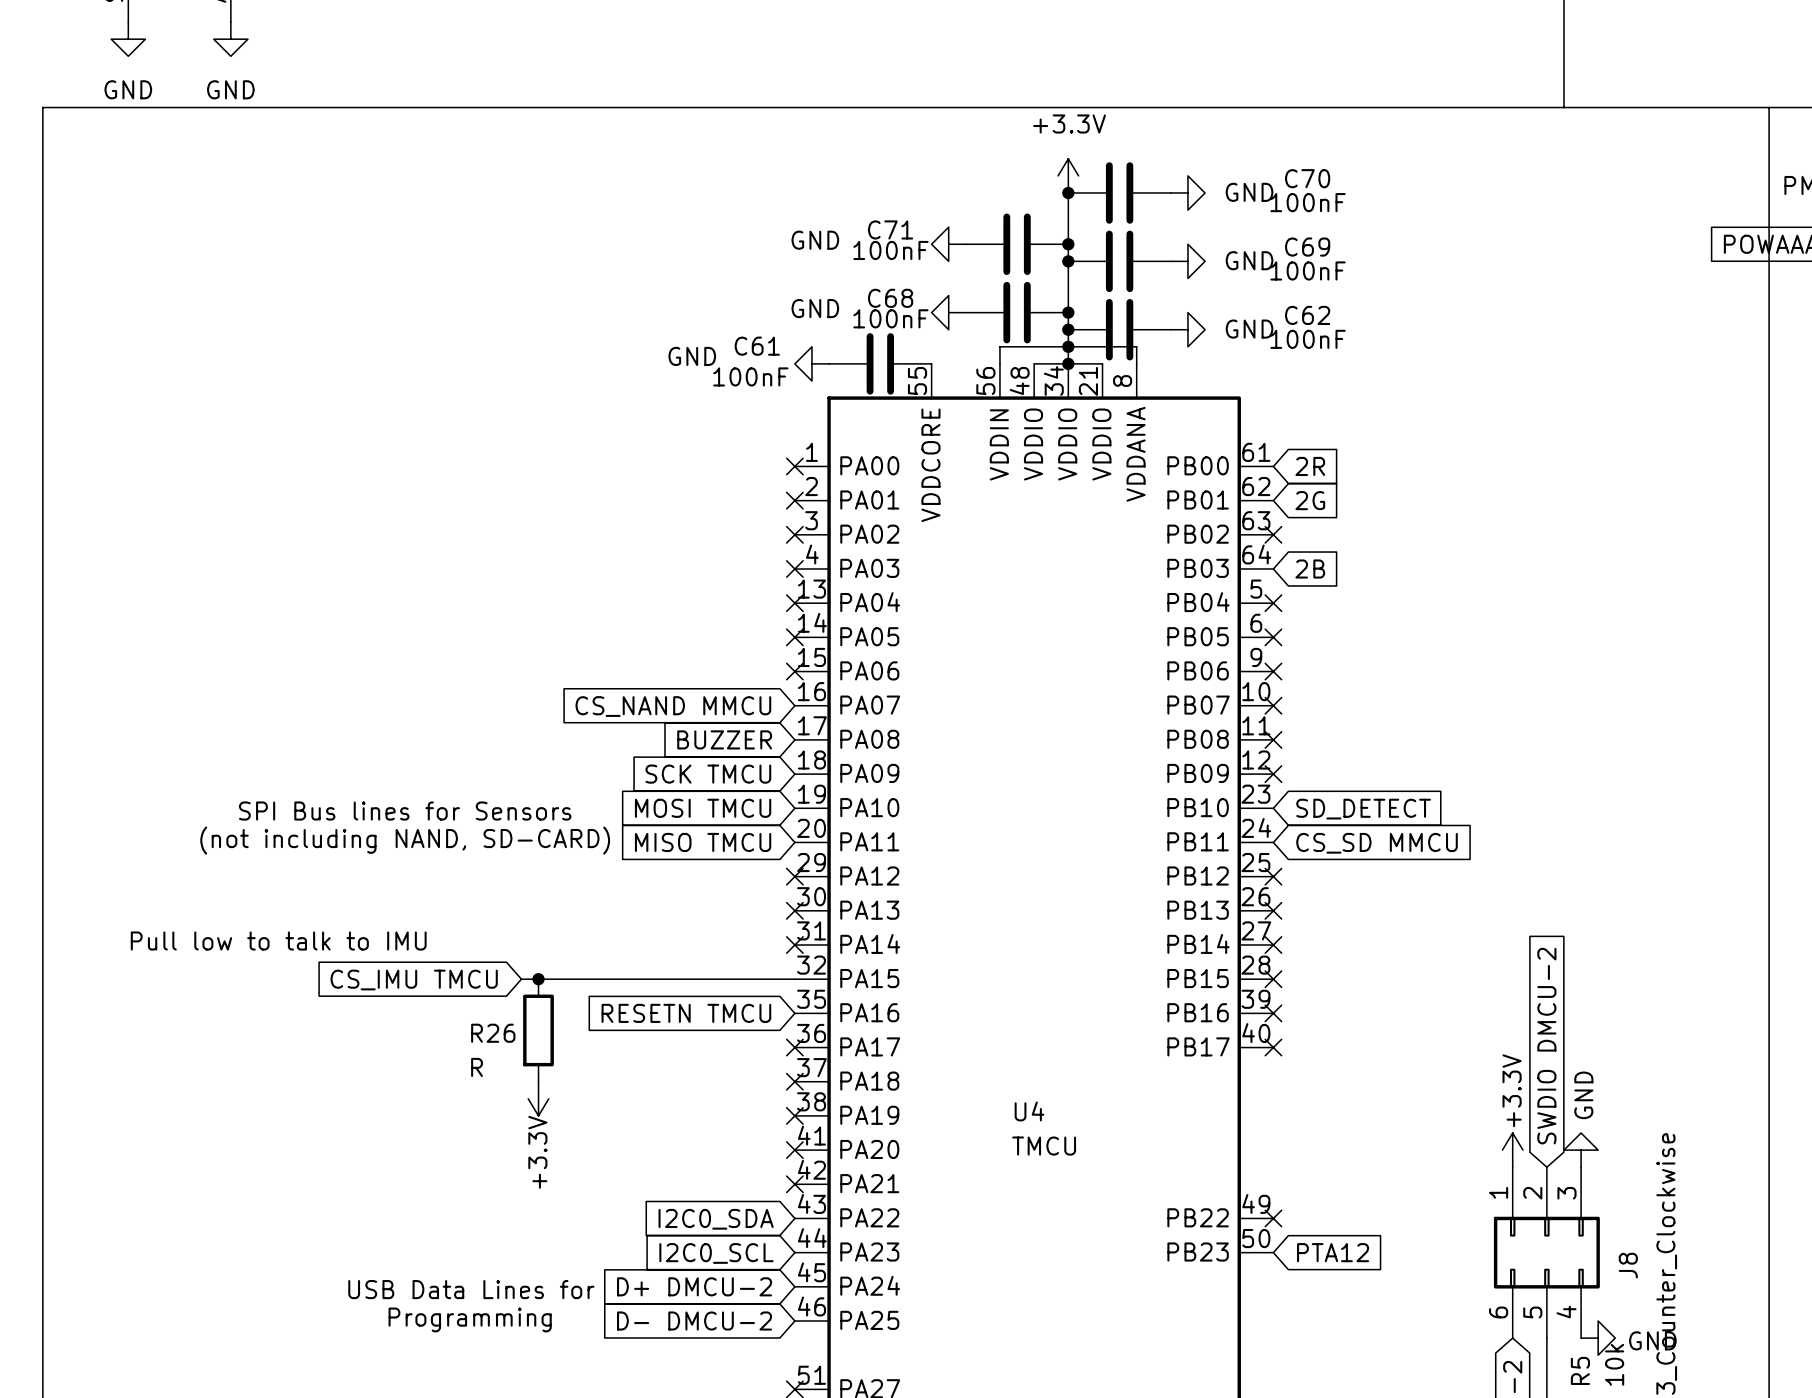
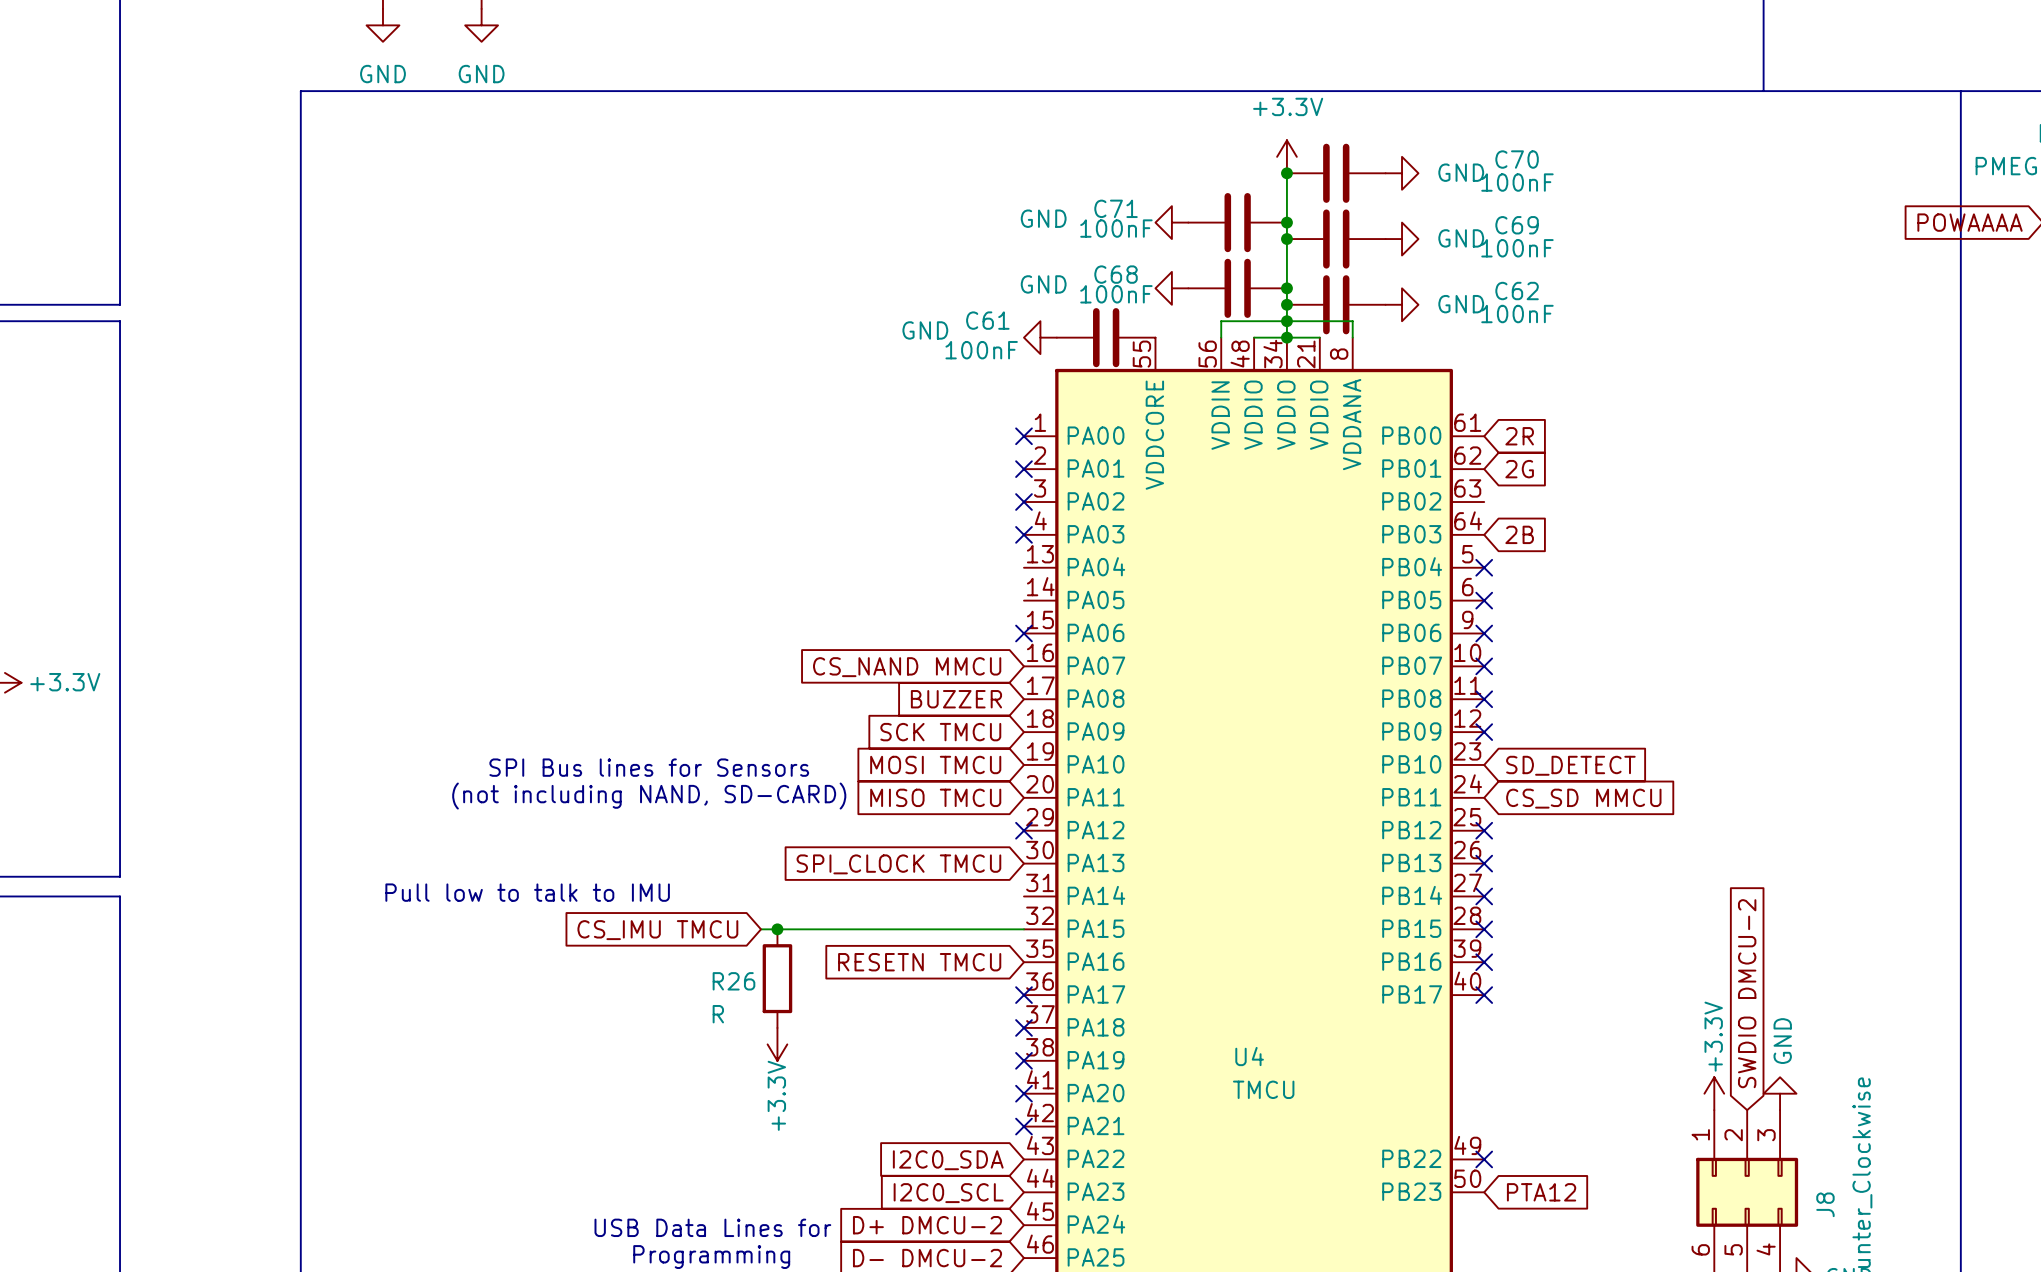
no-connect mark: (1273, 534) -> none
no-connect mark: (794, 603) -> none
no-connect mark: (794, 637) -> none
no-connect mark: (794, 910) -> none
global label: none -> SPI_CLOCK TMCU (898, 864)
no-connect mark: (794, 945) -> none

